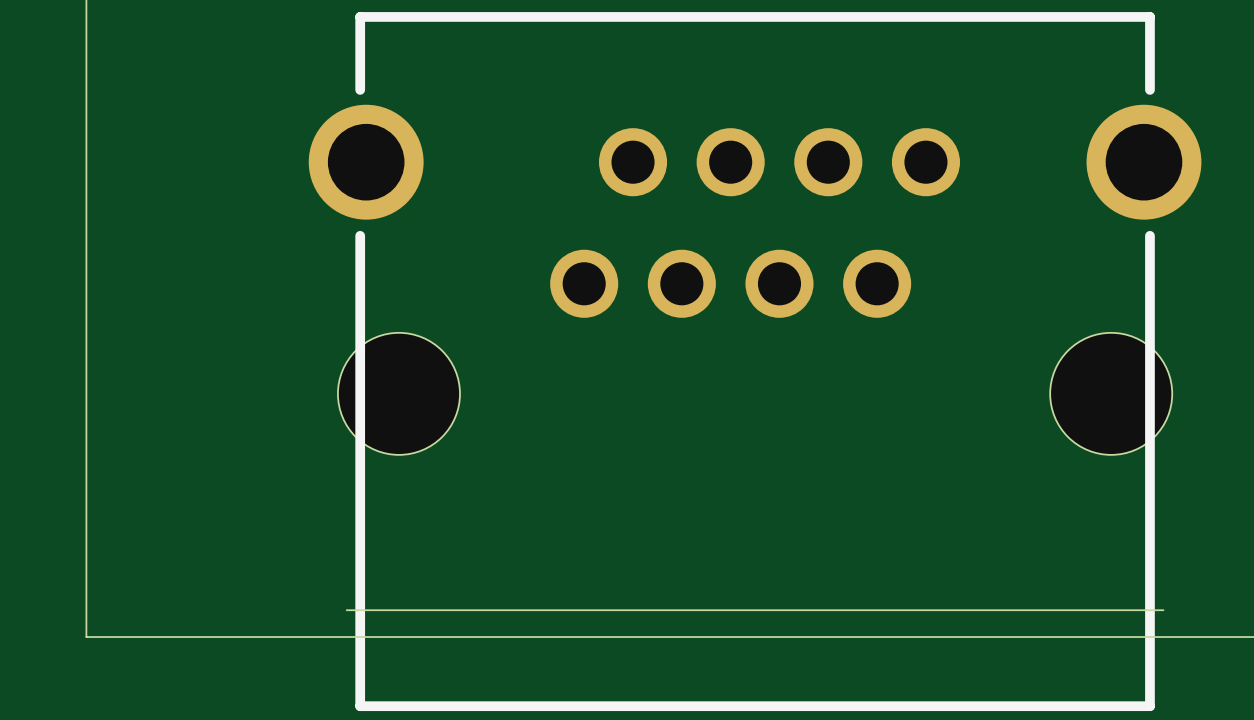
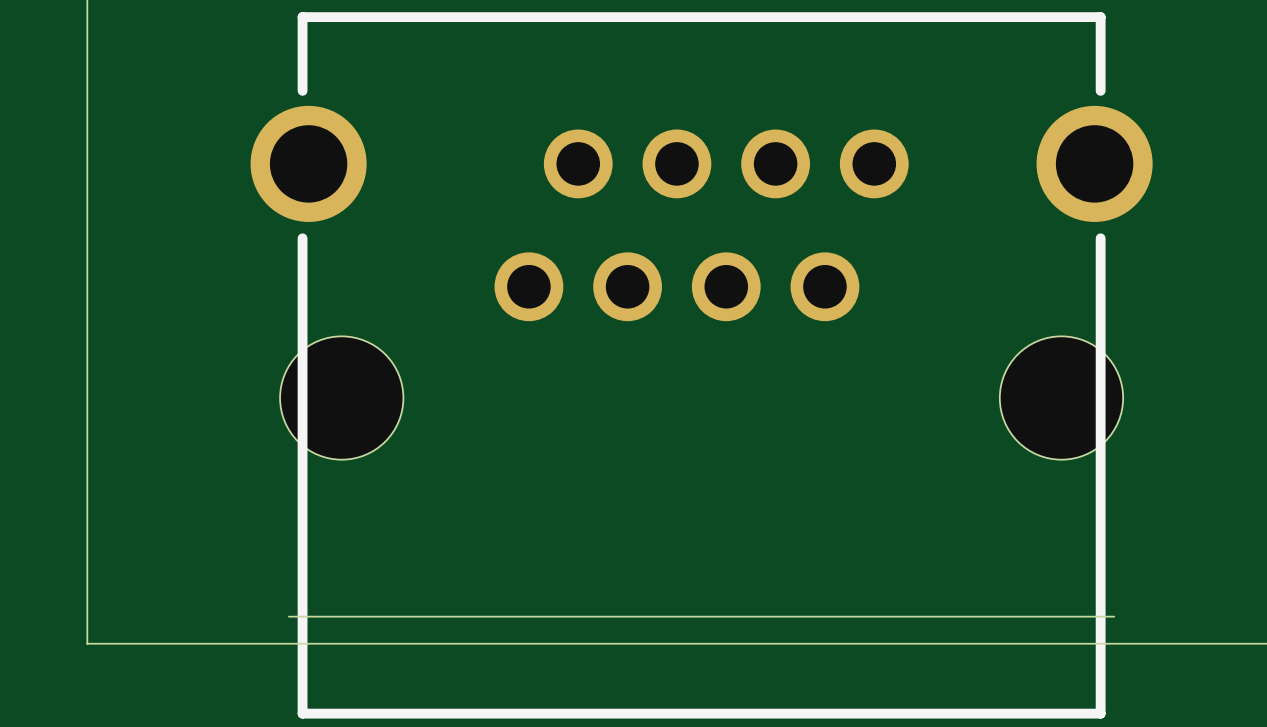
part position: (755, 361) -> (701, 365)

